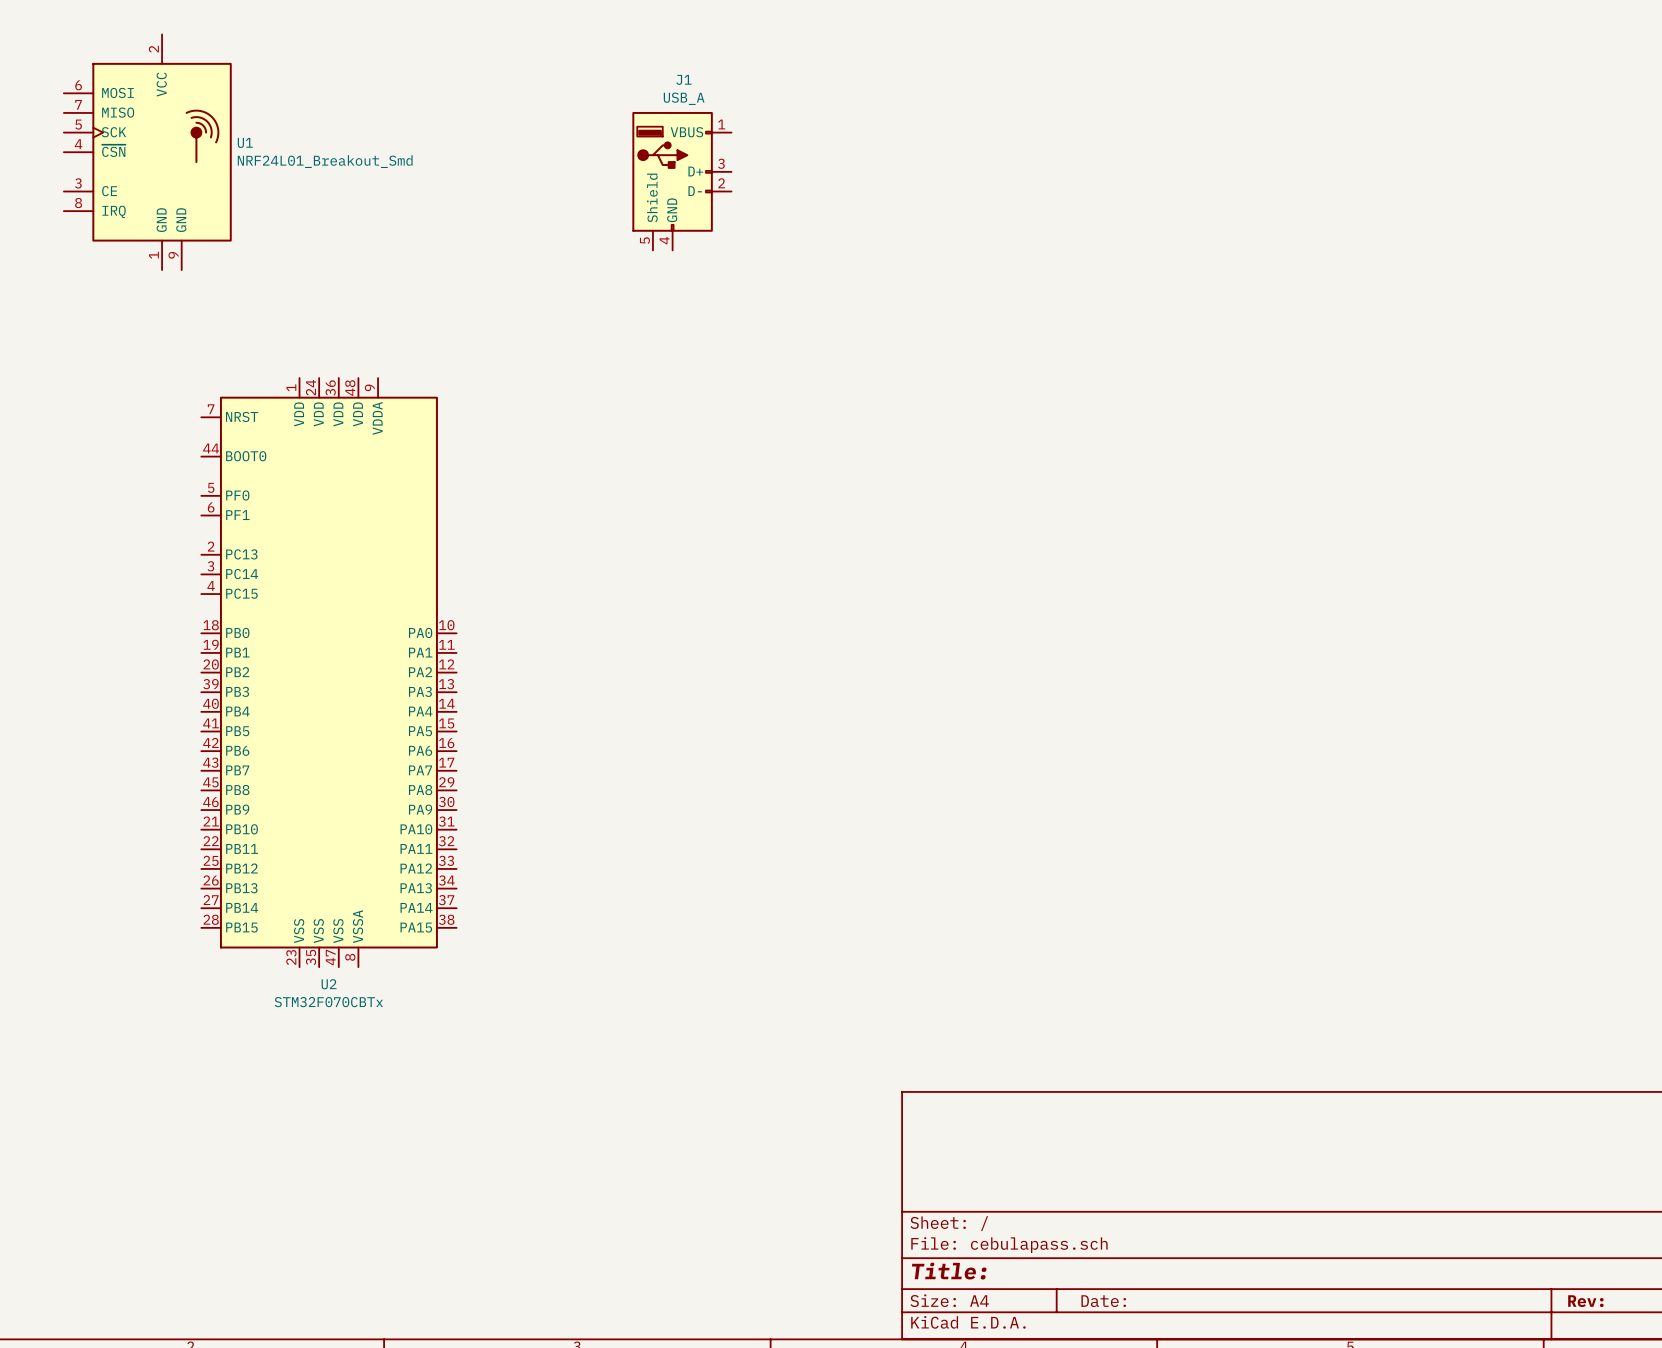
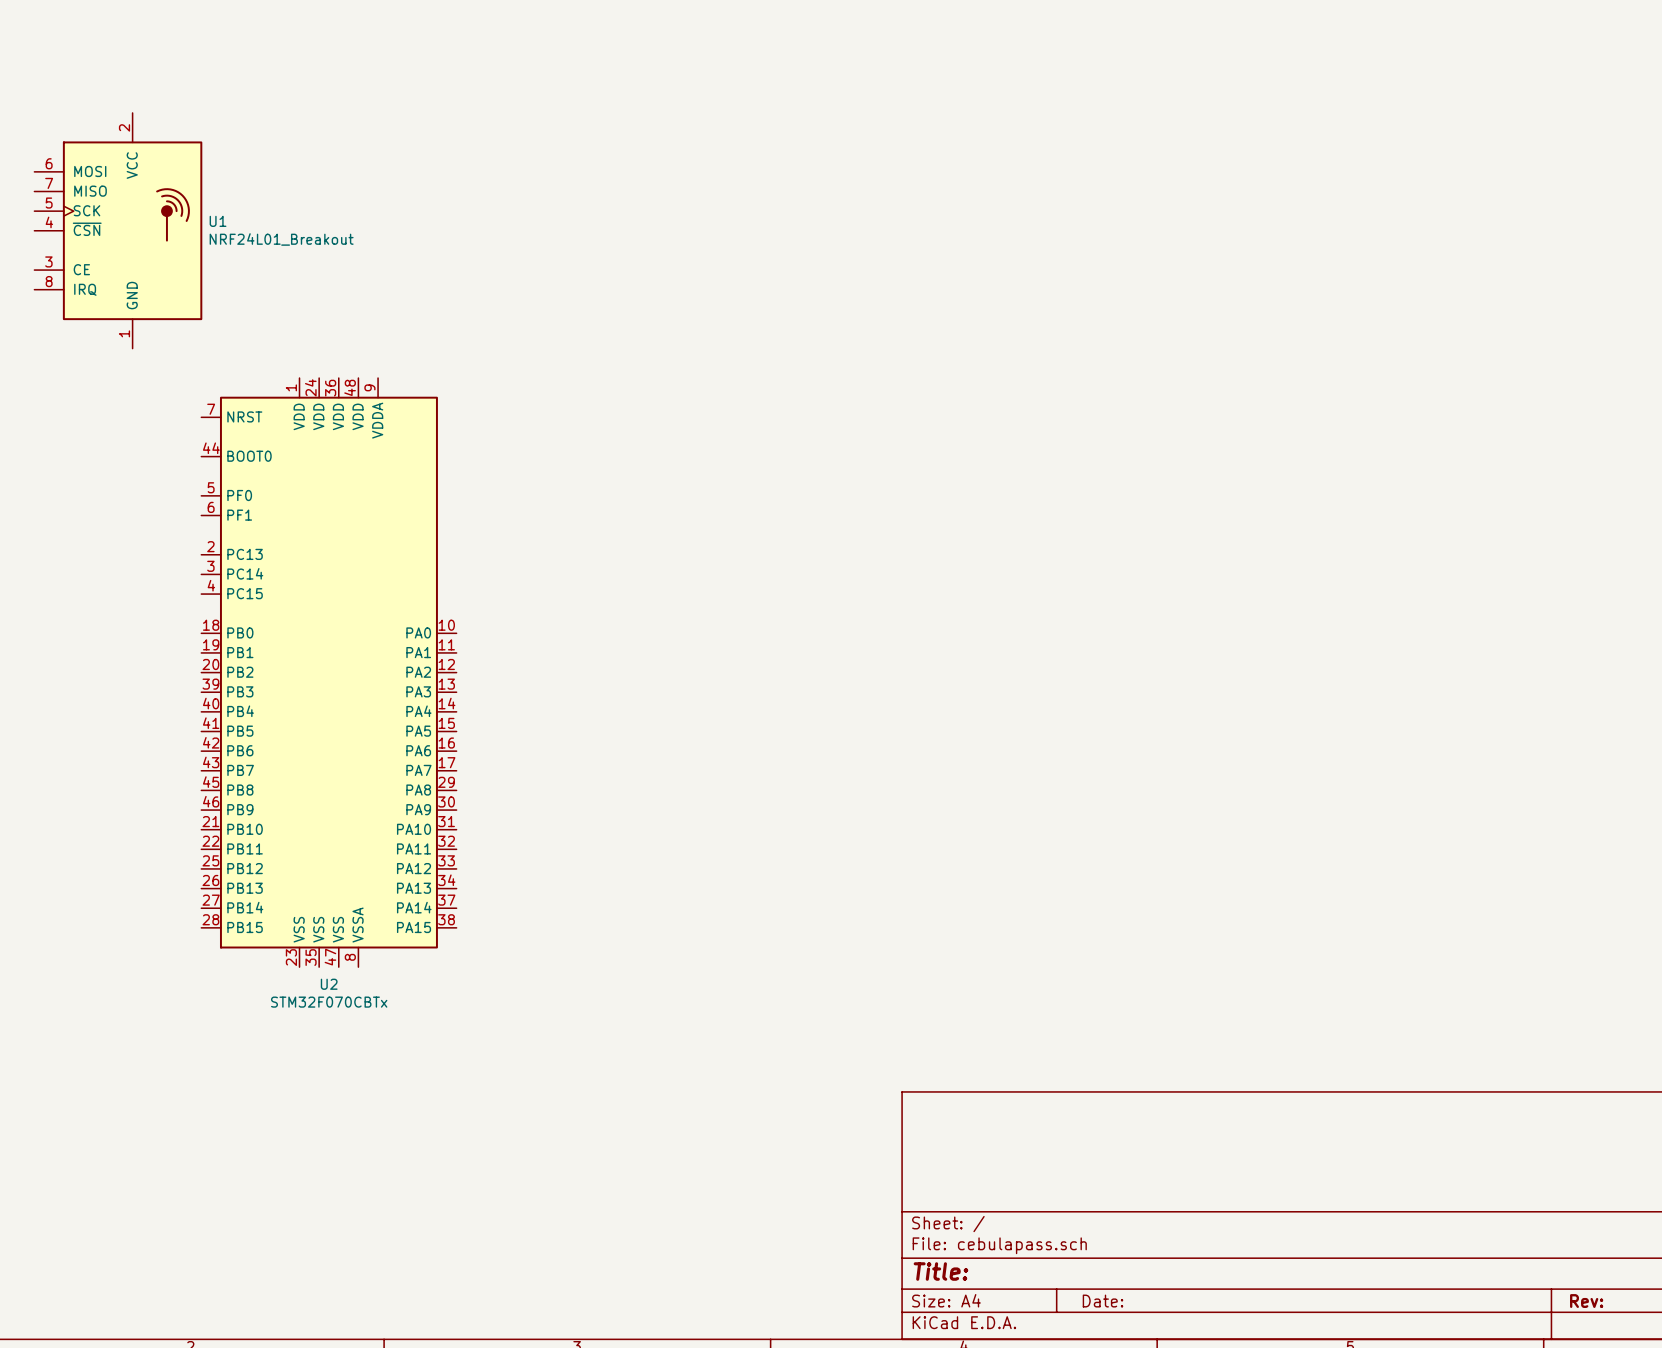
U1 symbol: [63, 34, 232, 271] -> [34, 112, 203, 349]
U1 value: NRF24L01_Breakout_Smd (325, 161) -> NRF24L01_Breakout (281, 239)
J1: USB_A (681, 181) -> none

